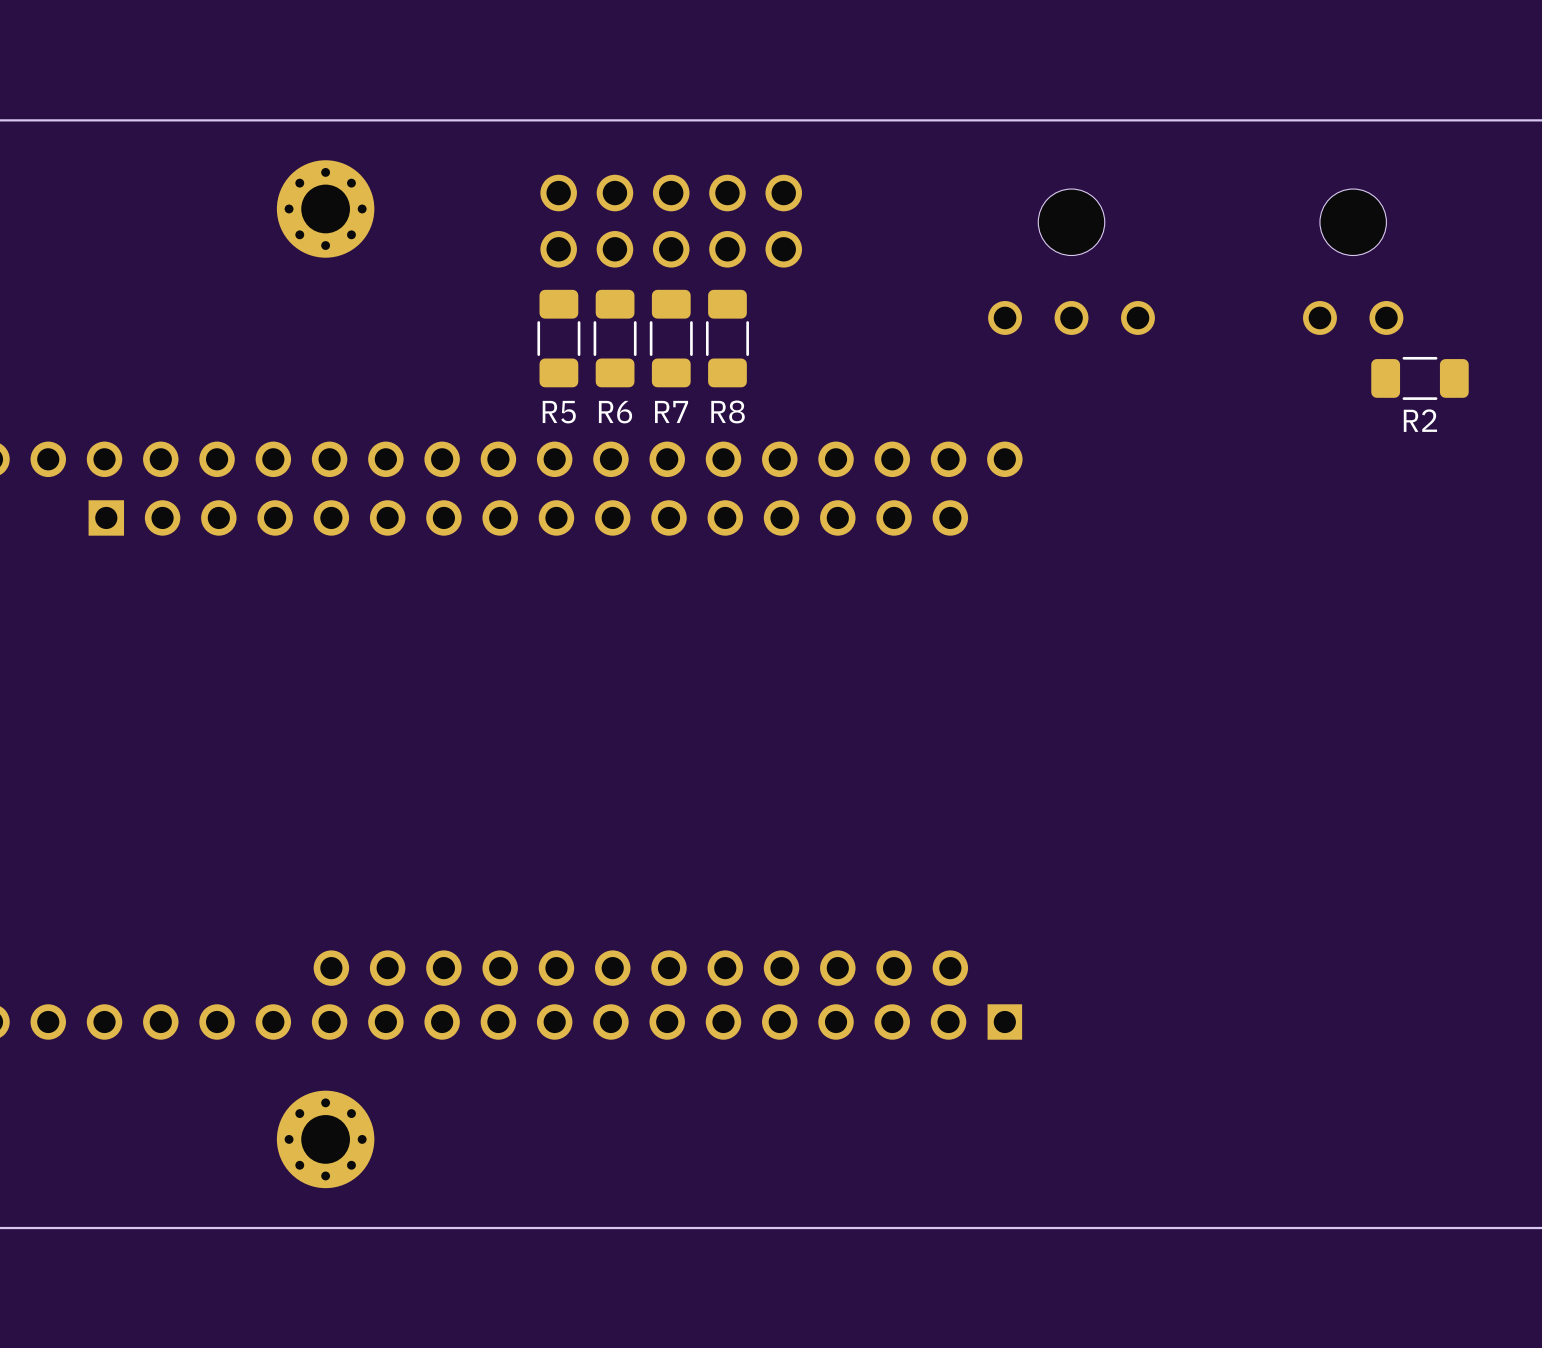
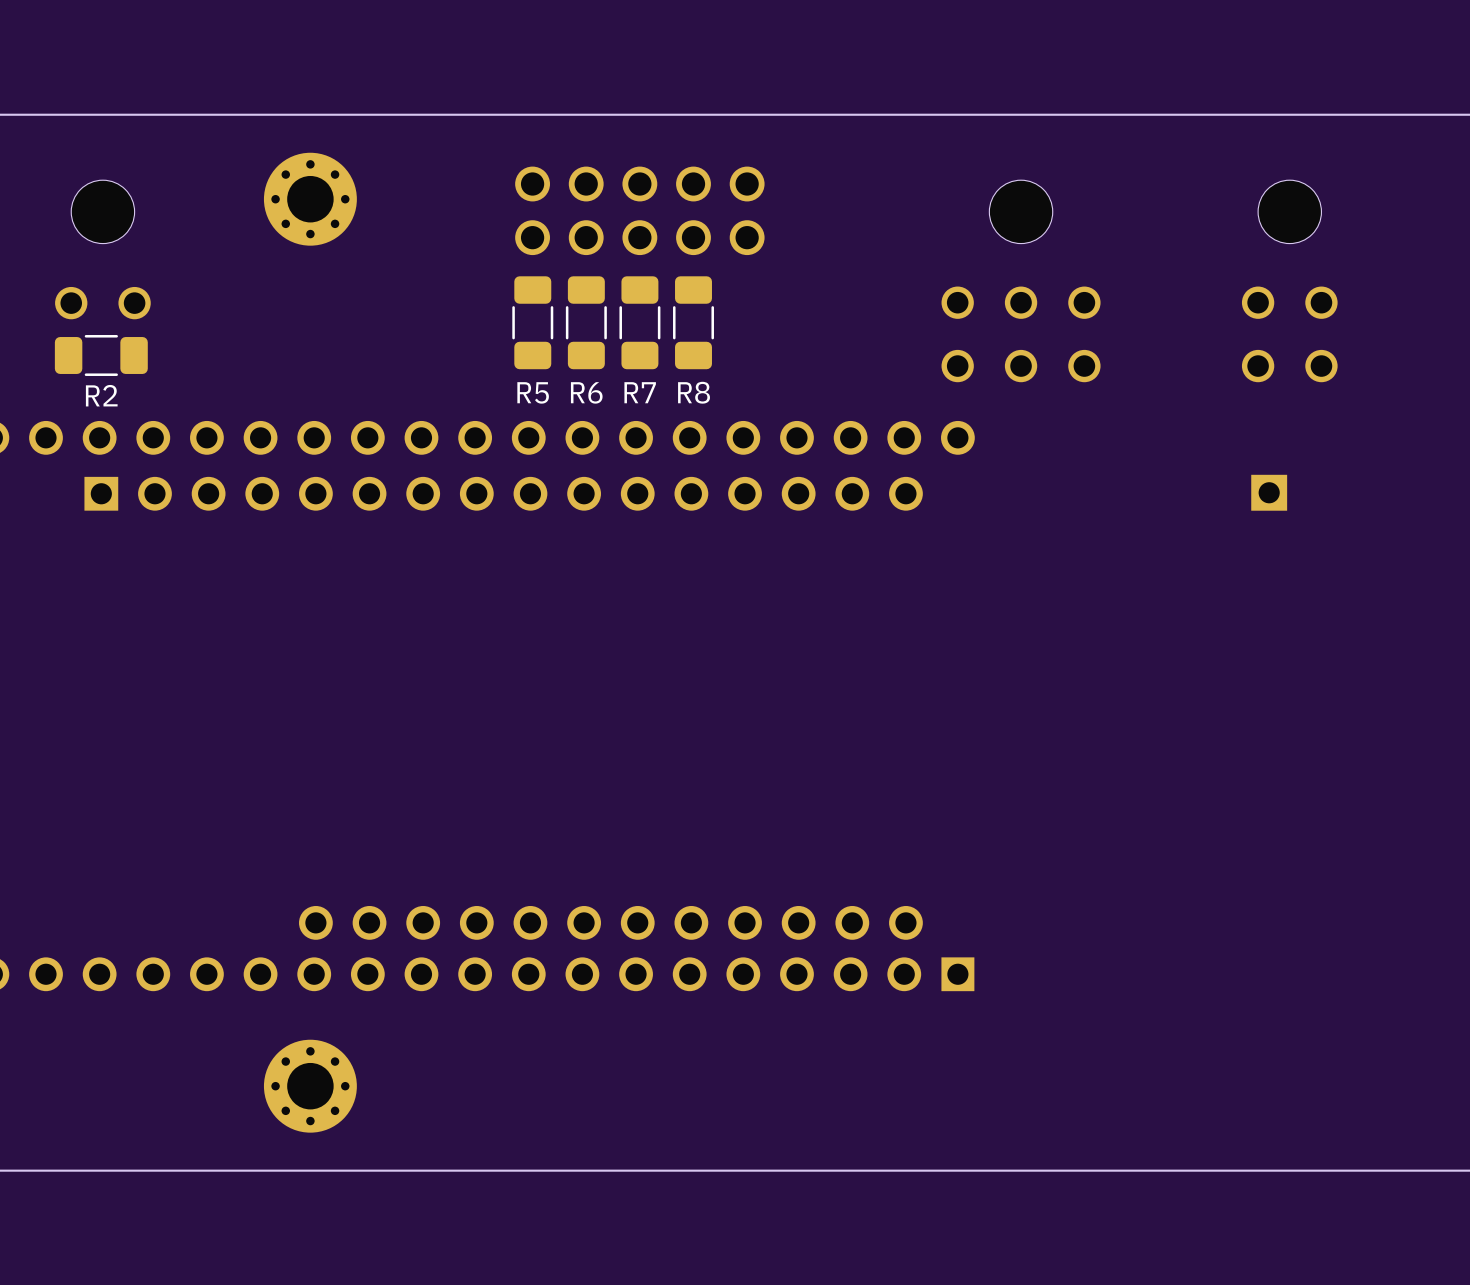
part: none -> (102, 249)
part: (1071, 261) -> none
part: (1353, 261) -> none
part: none -> (1021, 281)
part: none -> (1289, 281)
R2 position: (1419, 378) -> (101, 355)
part: none -> (1269, 492)

